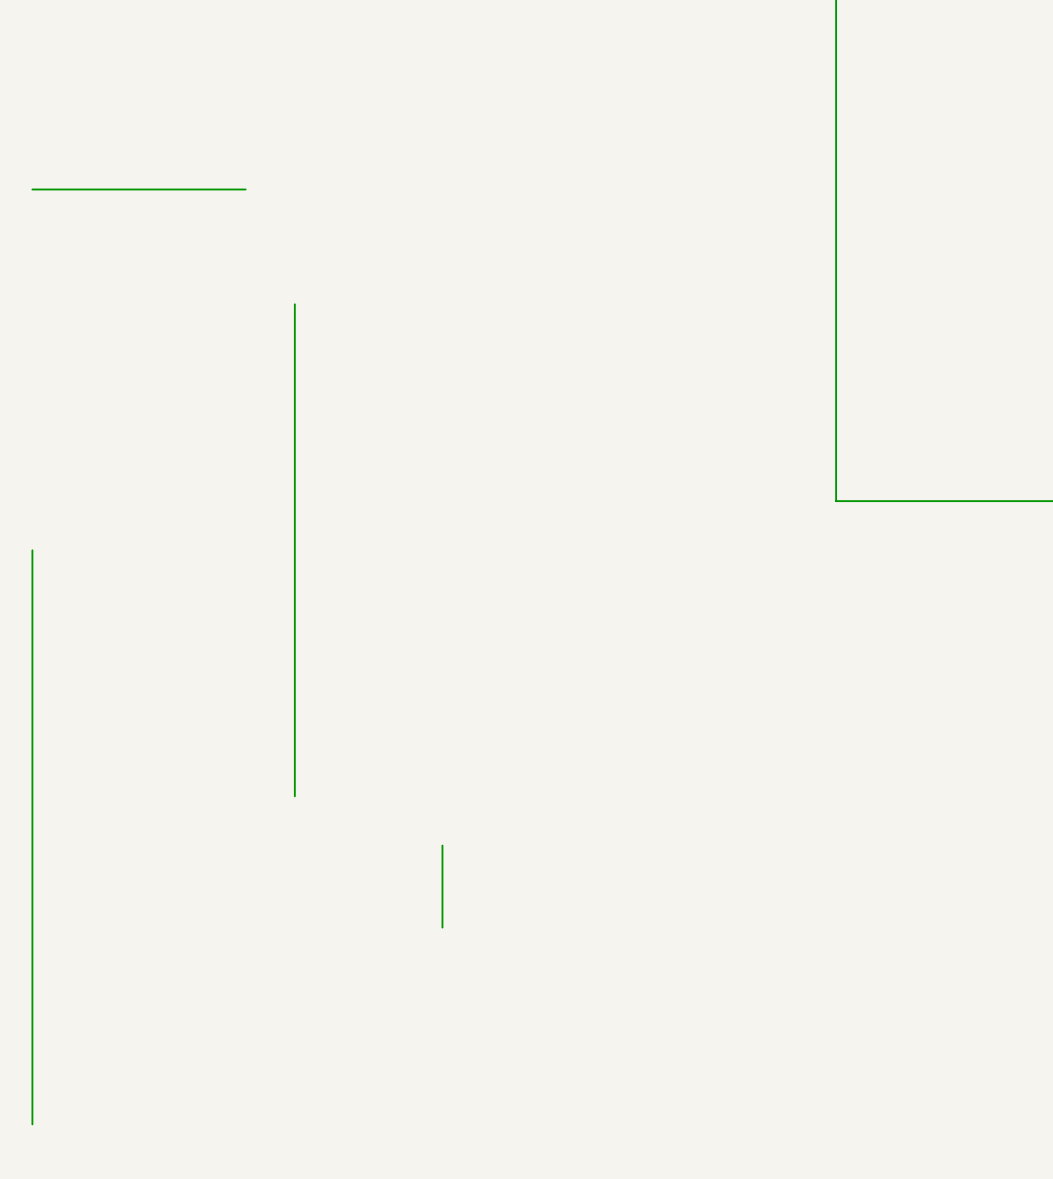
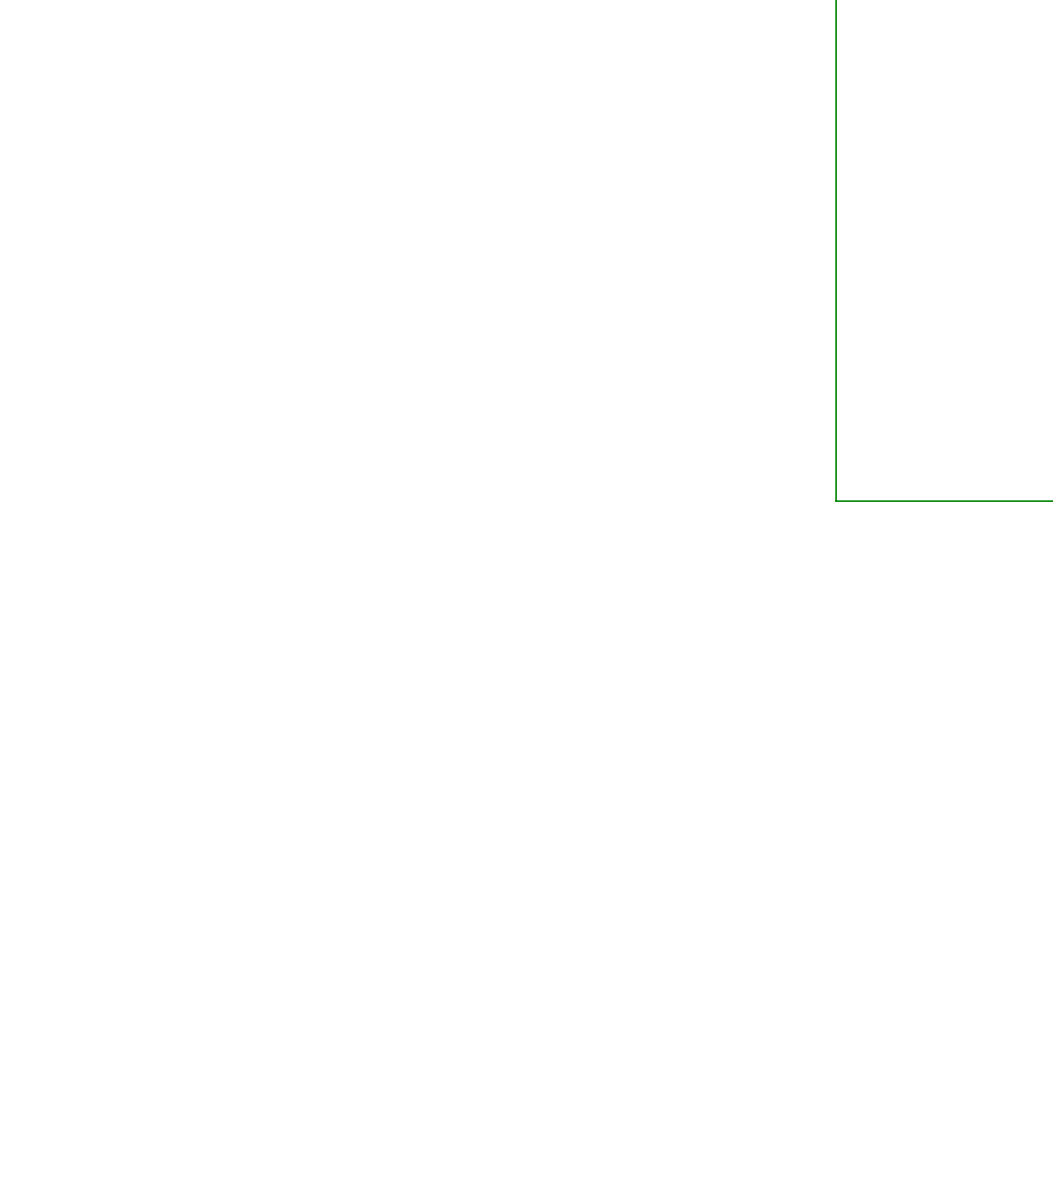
wire: (32, 189) (245, 189) -> none
wire: (294, 304) (294, 796) -> none
wire: (32, 550) (32, 1124) -> none
wire: (442, 845) (442, 927) -> none

